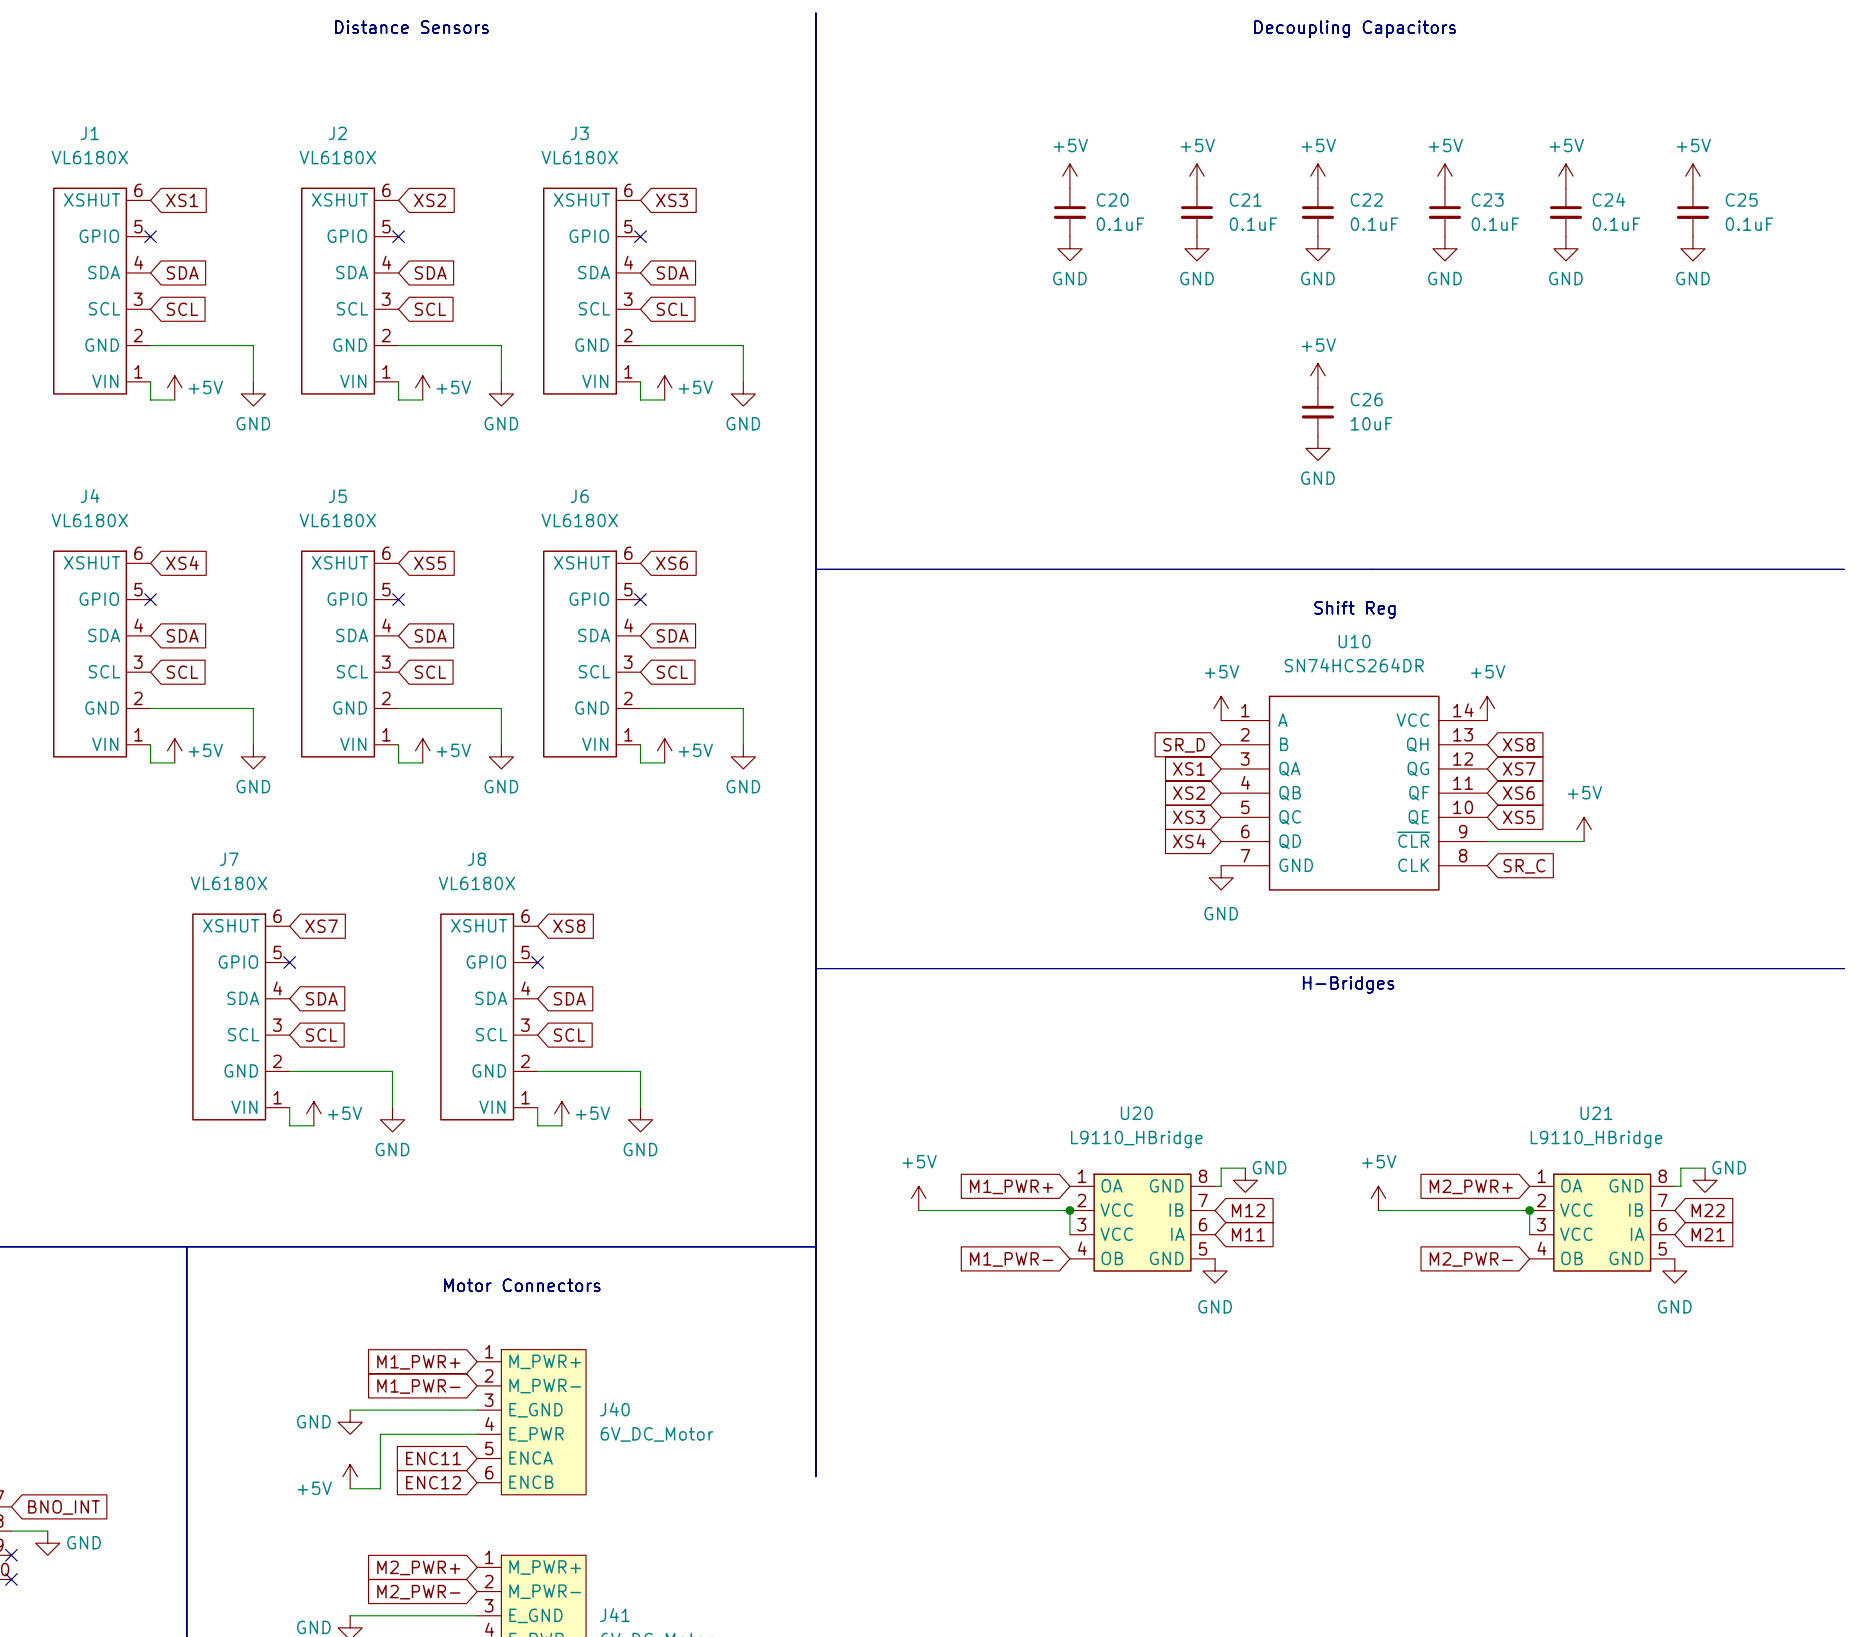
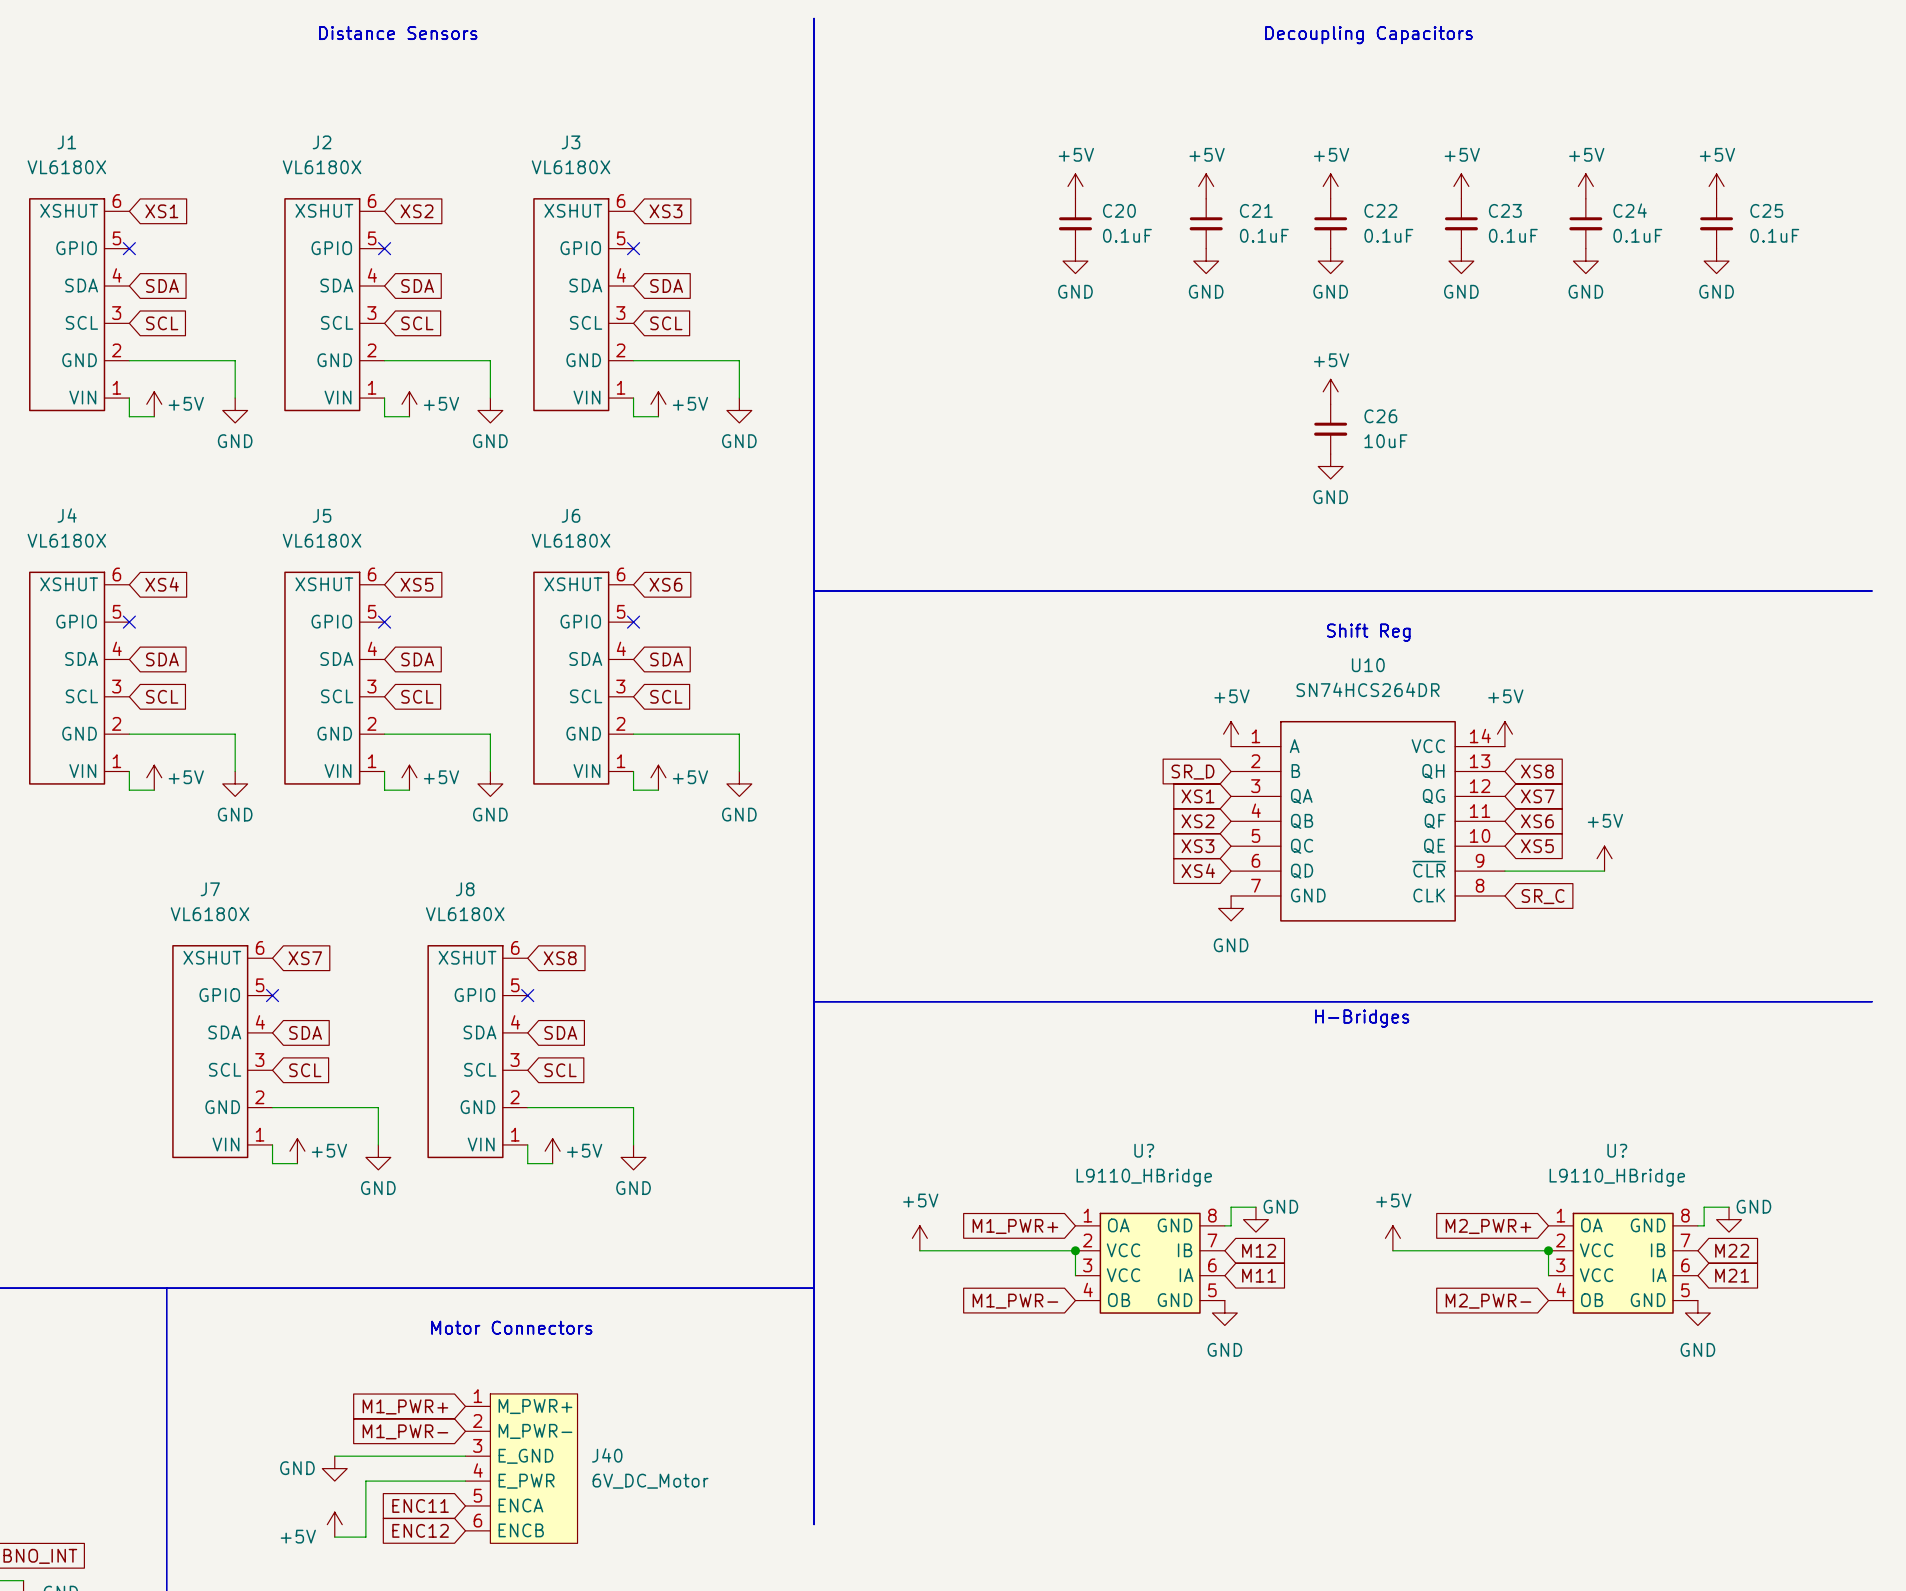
U20 name: U20 (1136, 1113) -> U? (1144, 1150)
U21 name: U21 (1596, 1113) -> U? (1617, 1150)

